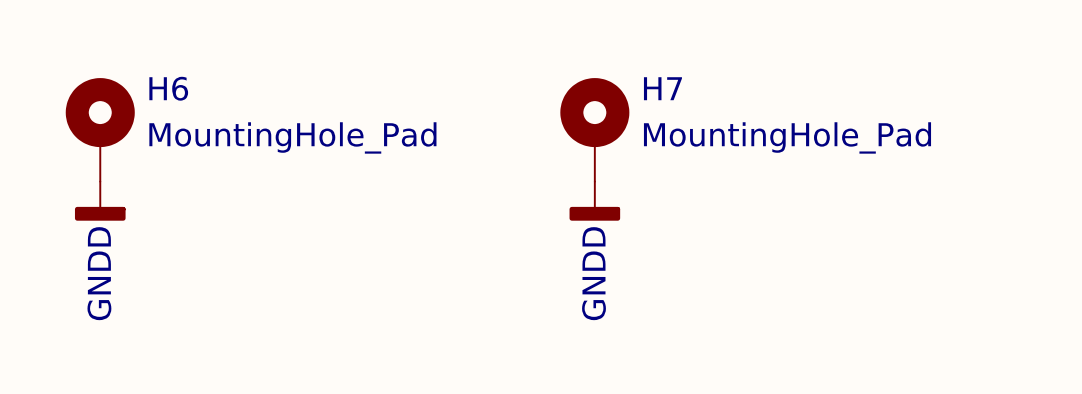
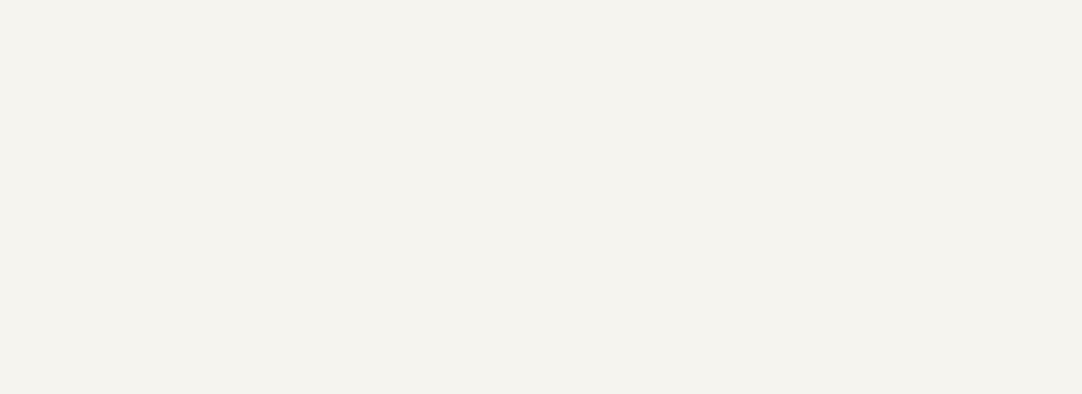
H6: MountingHole_Pad (100, 129) -> none
H7: MountingHole_Pad (594, 129) -> none
power symbol: GNDD (100, 201) -> none
power symbol: GNDD (594, 201) -> none

